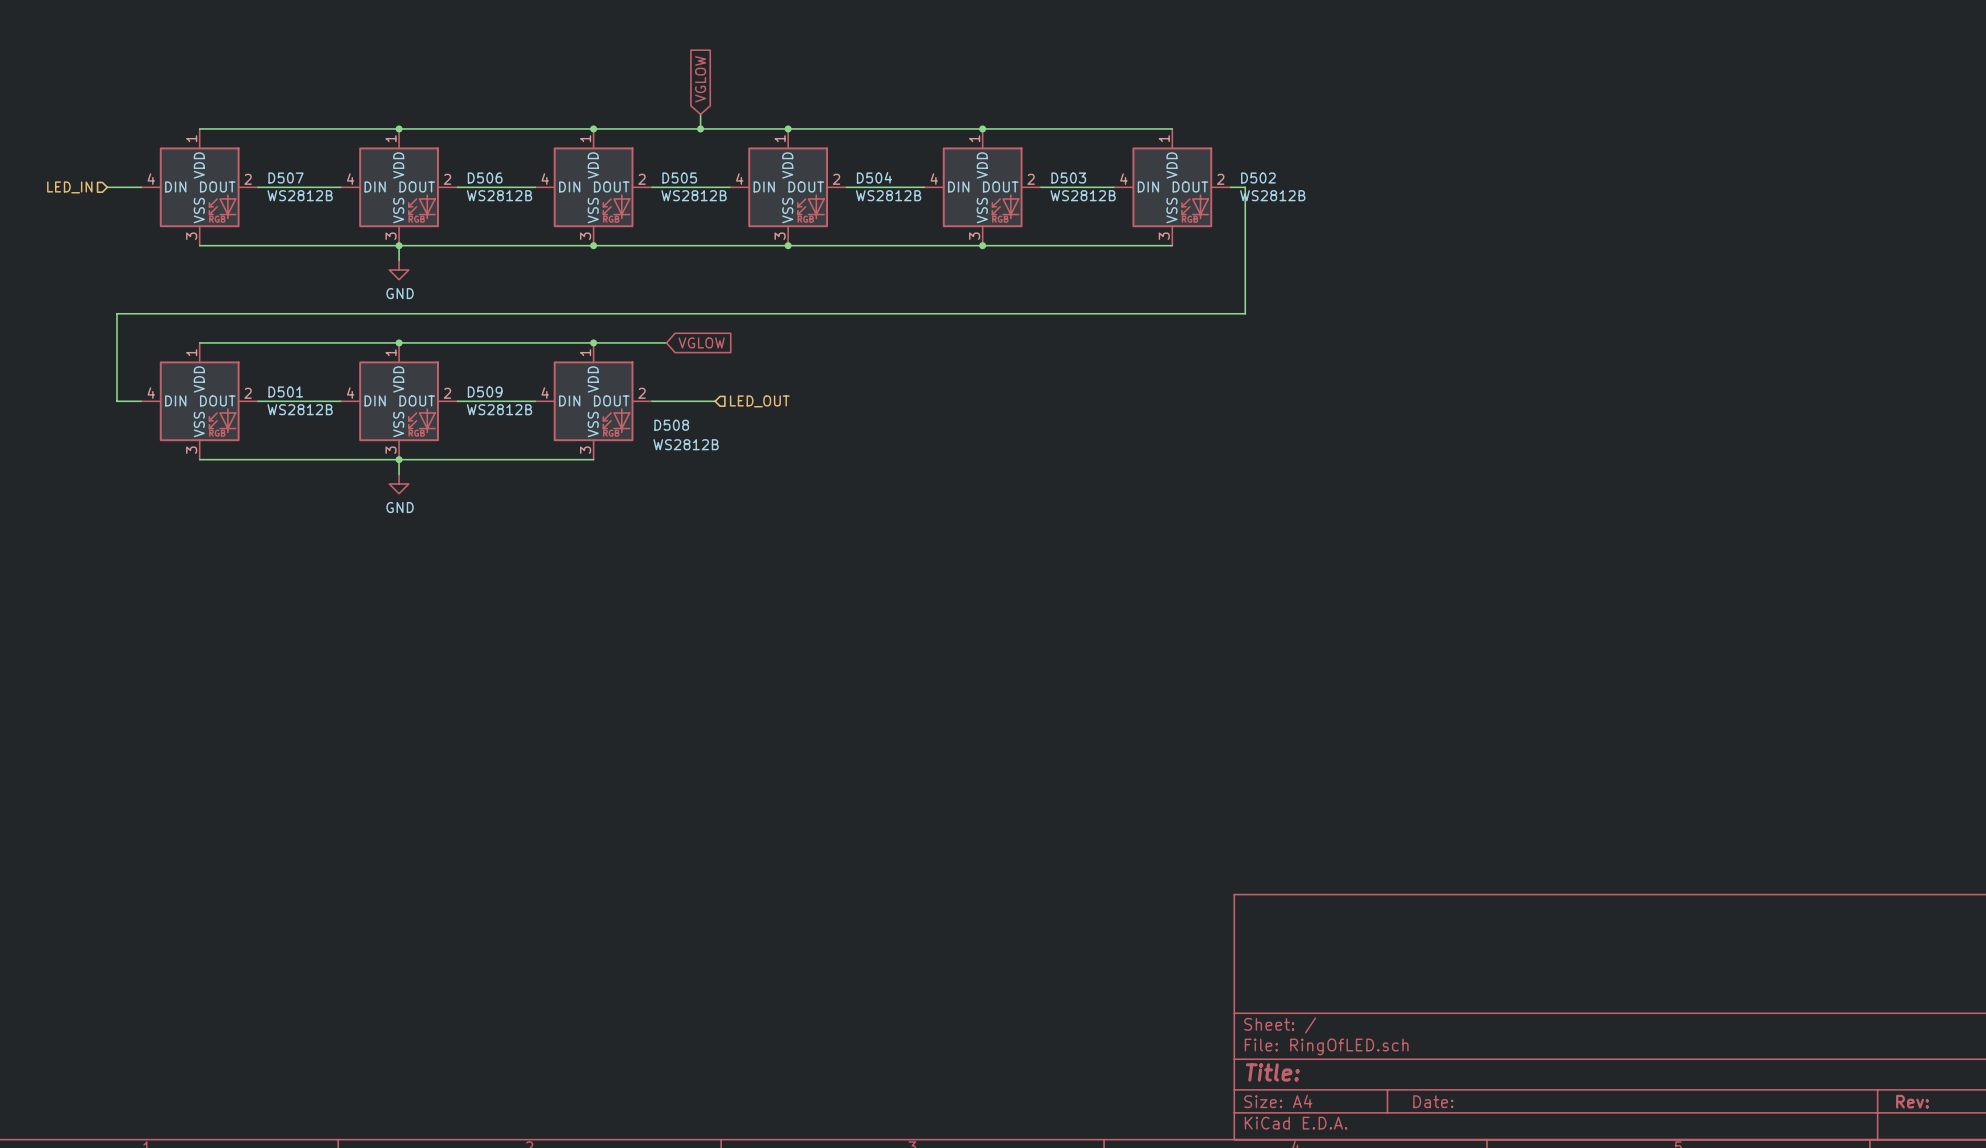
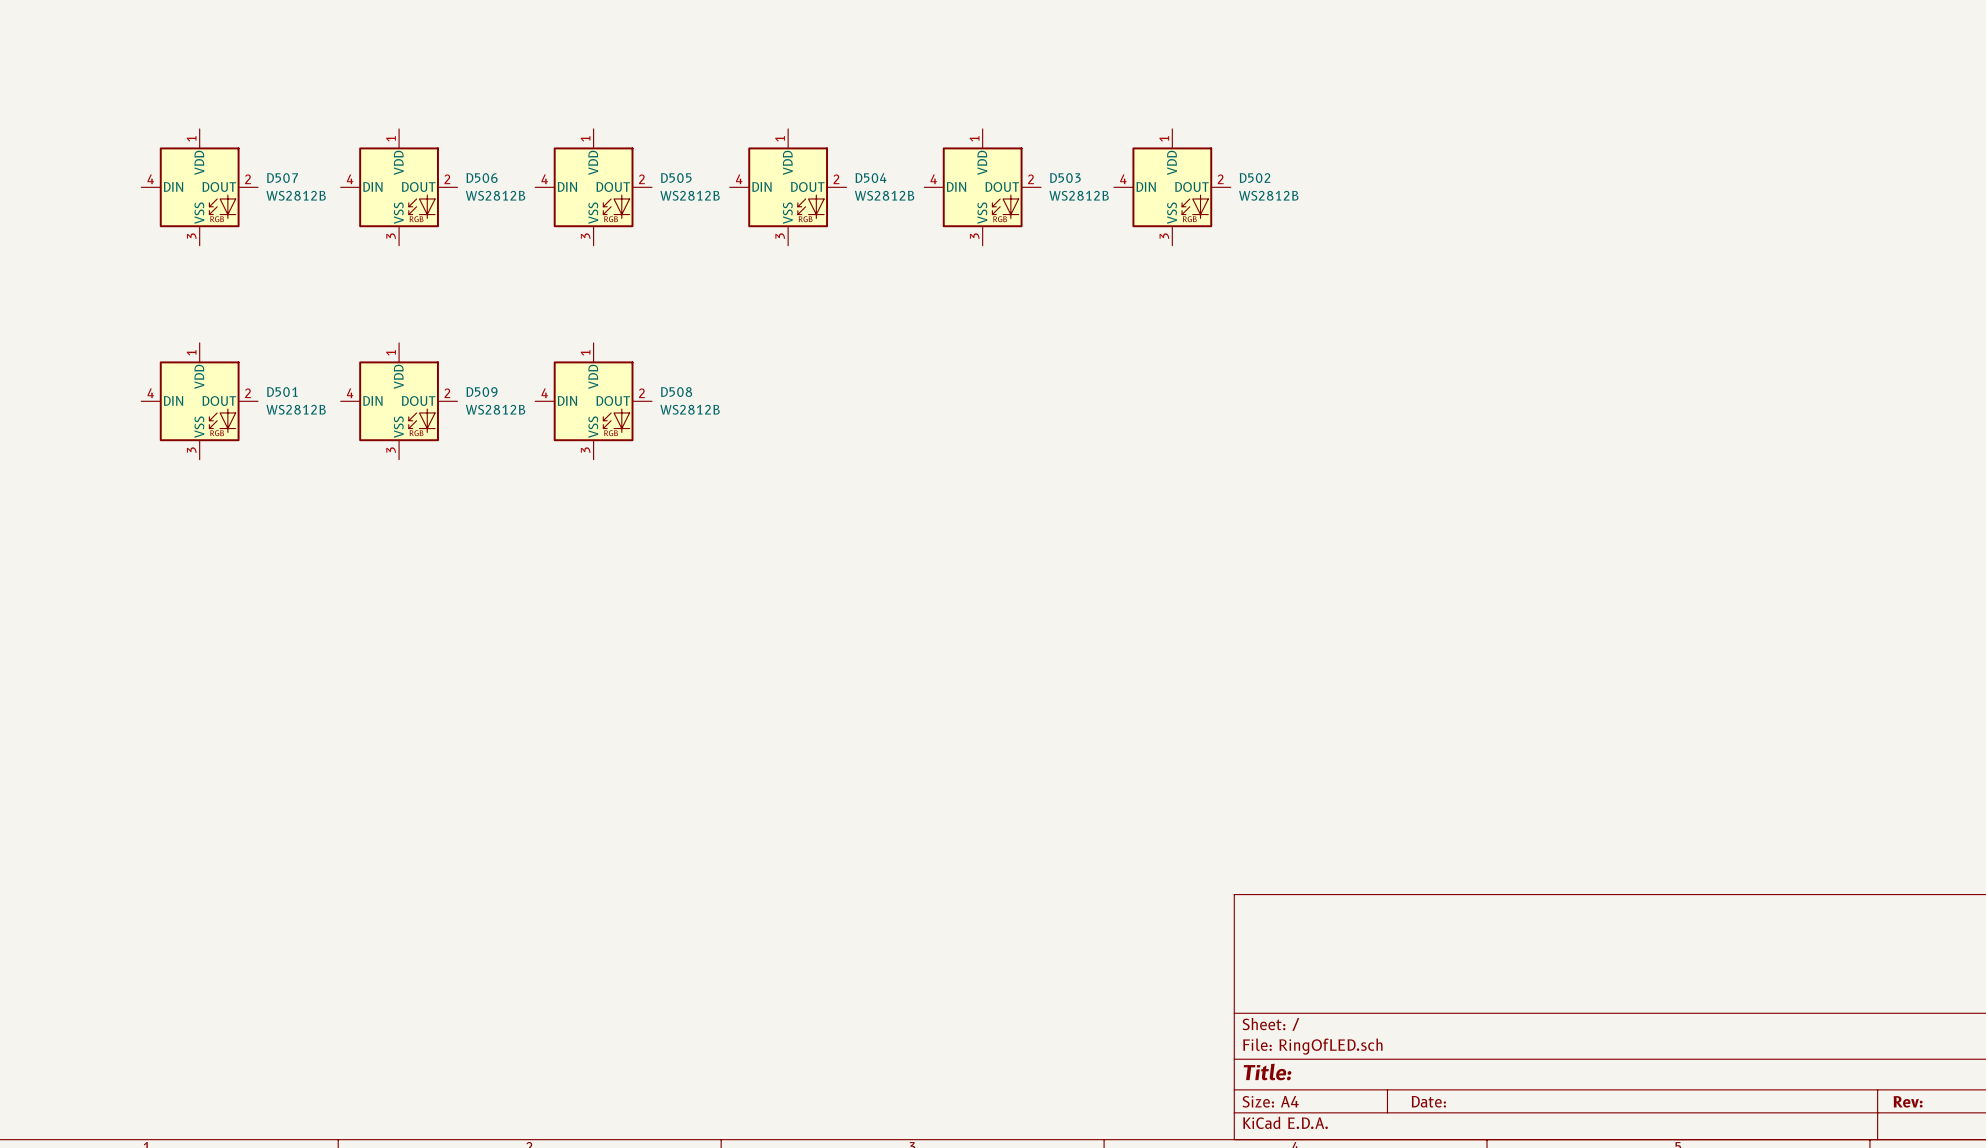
global label: VGLOW (700, 79) -> none
wire: (700, 114) (700, 128) -> none
wire: (199, 128) (1172, 128) -> none
junction: (399, 128) -> none
junction: (593, 128) -> none
junction: (700, 128) -> none
junction: (788, 128) -> none
junction: (982, 128) -> none
hierarchical label: LED_IN (69, 187) -> none
wire: (107, 187) (141, 187) -> none
wire: (258, 187) (340, 187) -> none
wire: (457, 187) (535, 187) -> none
wire: (651, 187) (729, 187) -> none
wire: (846, 187) (924, 187) -> none
wire: (1041, 187) (1113, 187) -> none
wire: (1230, 187) (1245, 187) (1245, 313) (117, 313) (117, 401) (141, 401) -> none
wire: (199, 245) (1172, 245) -> none
wire: (399, 245) (399, 260) -> none
junction: (399, 245) -> none
junction: (593, 245) -> none
junction: (788, 245) -> none
junction: (982, 245) -> none
power symbol: GND (399, 269) -> none
wire: (199, 342) (666, 342) -> none
junction: (399, 342) -> none
junction: (593, 342) -> none
global label: VGLOW (701, 342) -> none
wire: (258, 401) (340, 401) -> none
wire: (457, 401) (535, 401) -> none
wire: (651, 401) (715, 401) -> none
hierarchical label: LED_OUT (759, 401) -> none
D508 name position: D508 (671, 425) -> D508 (676, 392)
D508 value position: WS2812B (686, 444) -> WS2812B (690, 409)
wire: (199, 459) (593, 459) -> none
wire: (399, 459) (399, 474) -> none
junction: (399, 459) -> none
power symbol: GND (399, 483) -> none

